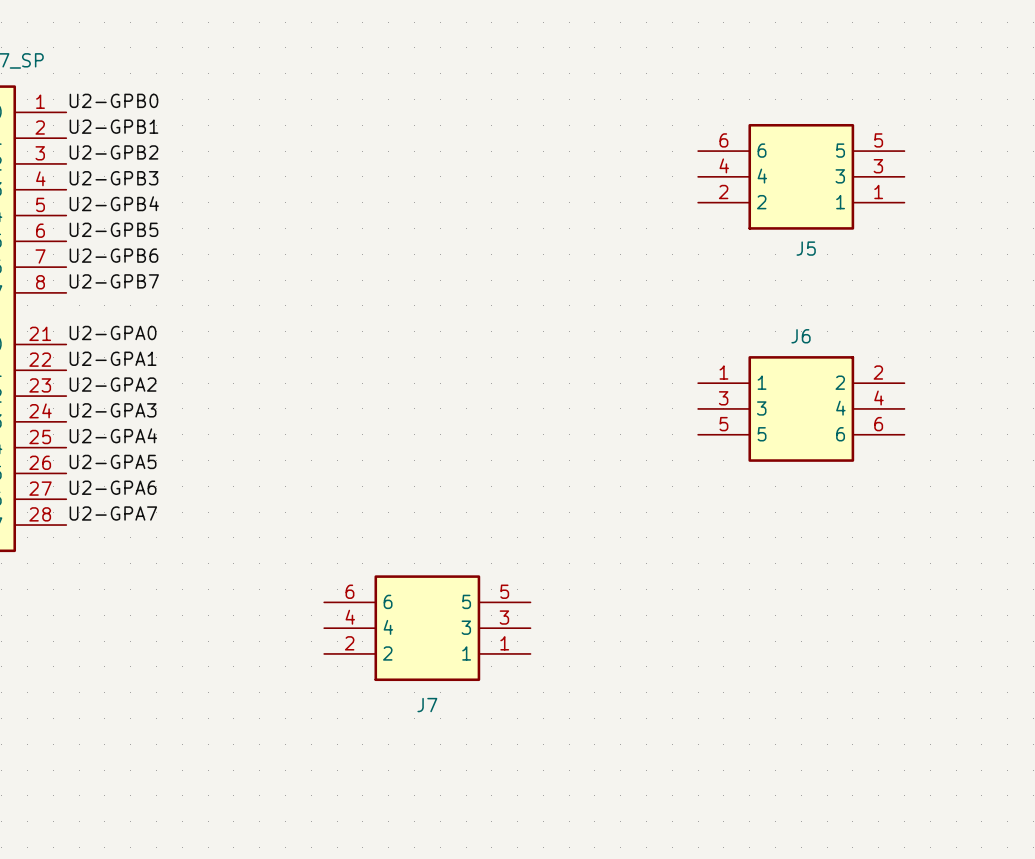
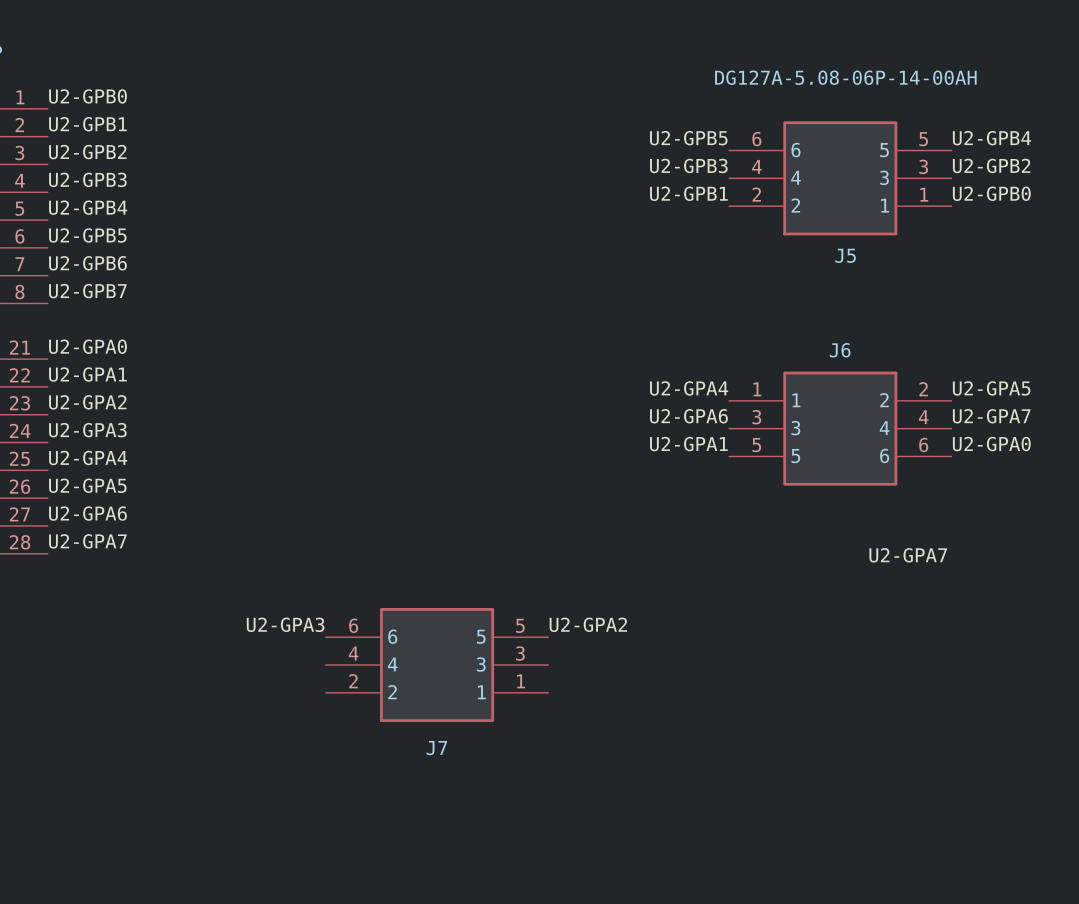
J5 value: none -> DG127A-5.08-06P-14-00AH (845, 77)
label: none -> U2-GPB5 (688, 138)
label: none -> U2-GPB4 (991, 138)
label: none -> U2-GPB3 (688, 165)
label: none -> U2-GPB2 (991, 165)
label: none -> U2-GPB1 (688, 193)
label: none -> U2-GPB0 (991, 193)
label: none -> U2-GPA4 (689, 388)
label: none -> U2-GPA5 (991, 388)
label: none -> U2-GPA6 (688, 416)
label: none -> U2-GPA7 (991, 416)
label: none -> U2-GPA1 (688, 444)
label: none -> U2-GPA0 (991, 444)
label: none -> U2-GPA7 (908, 555)
label: none -> U2-GPA3 (285, 624)
label: none -> U2-GPA2 (588, 624)

